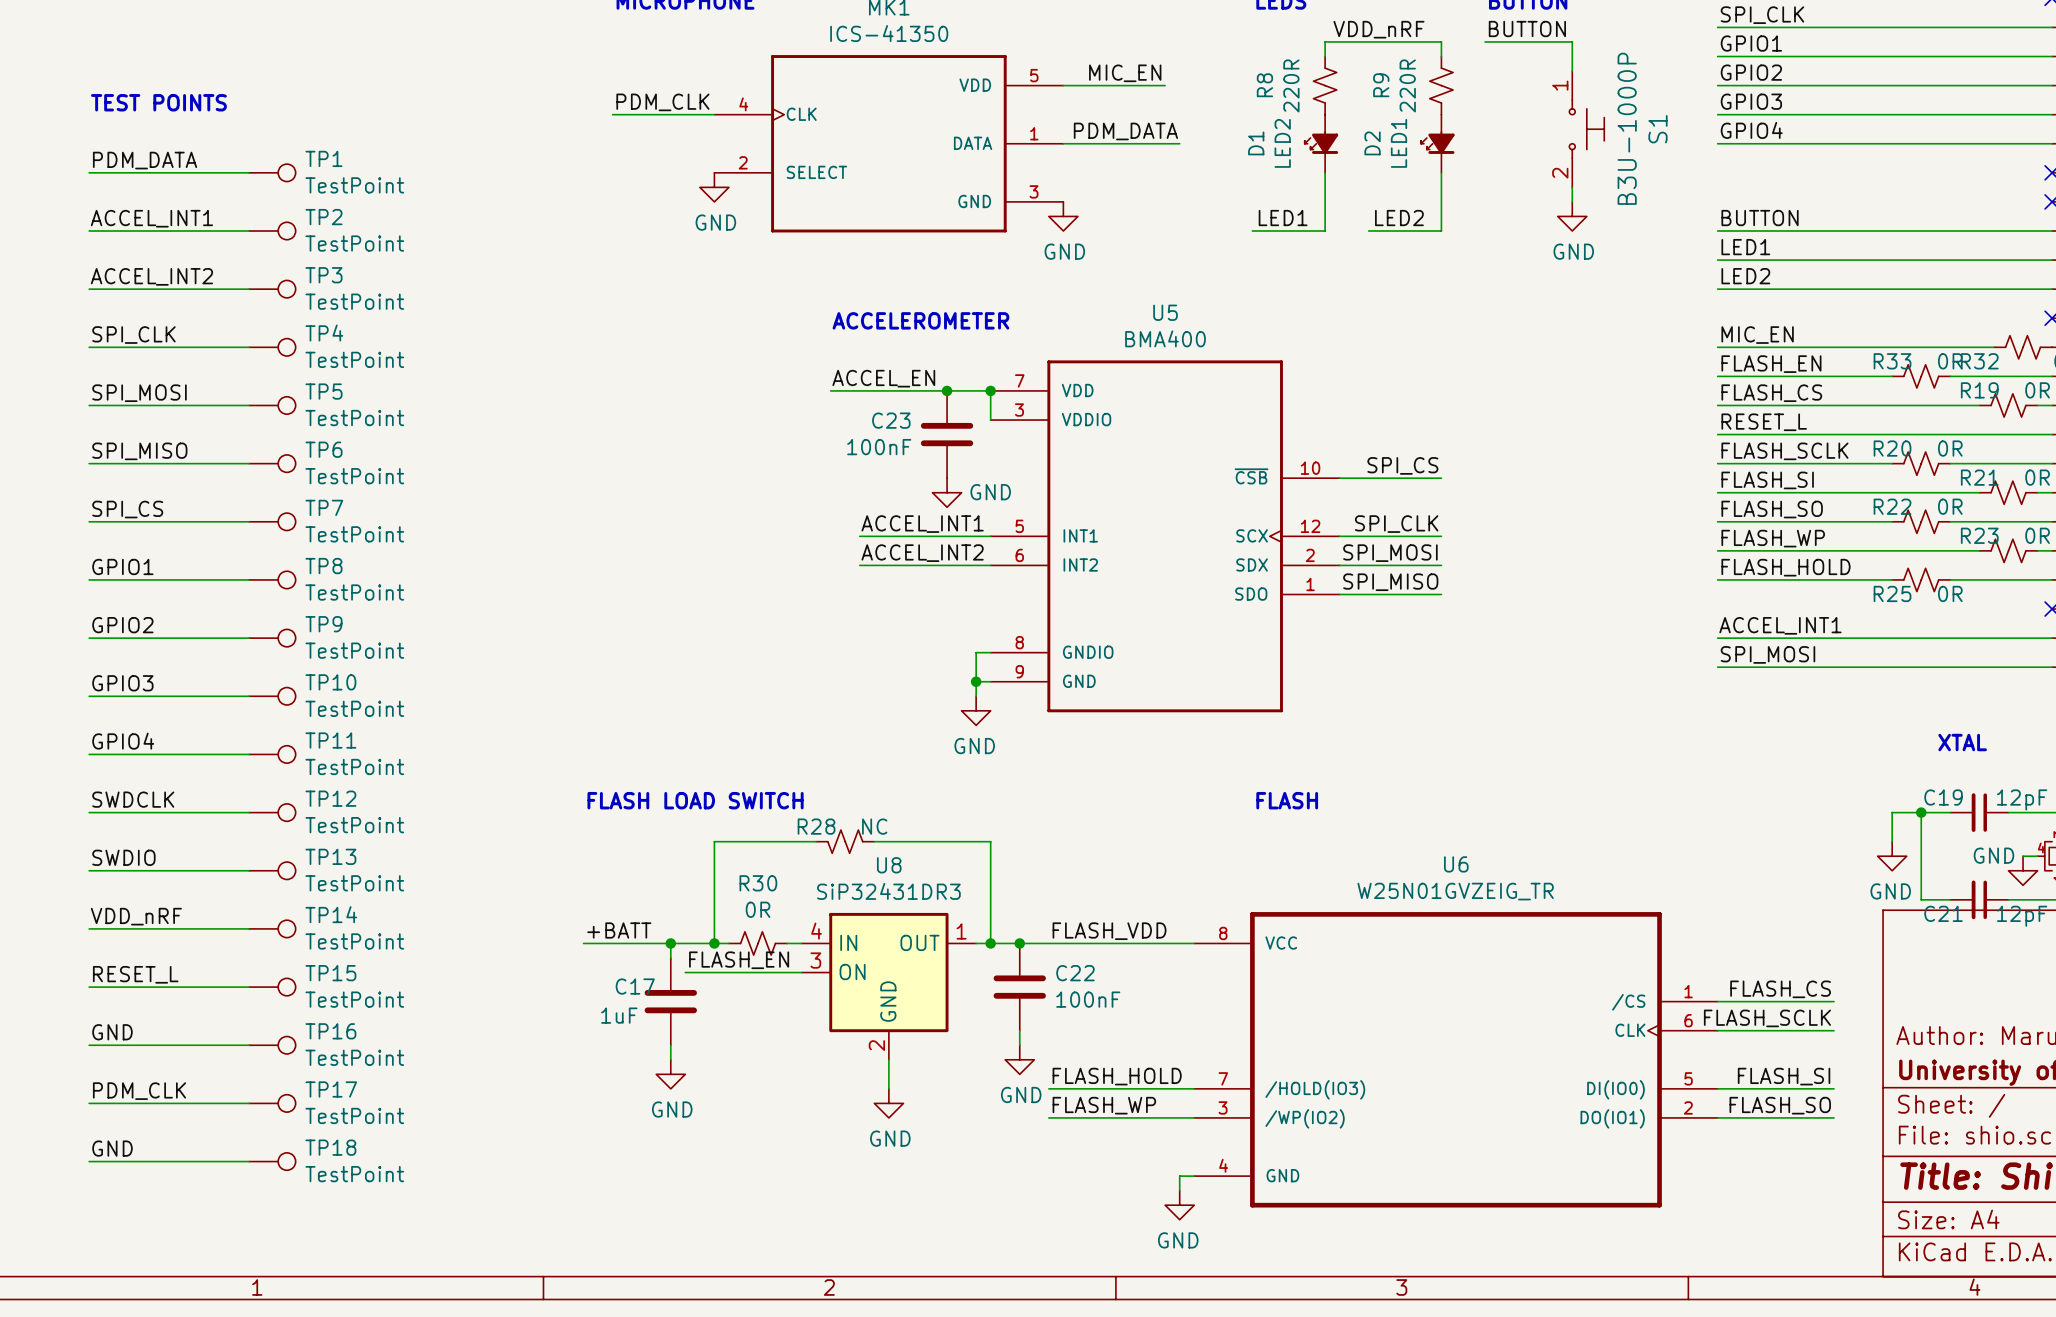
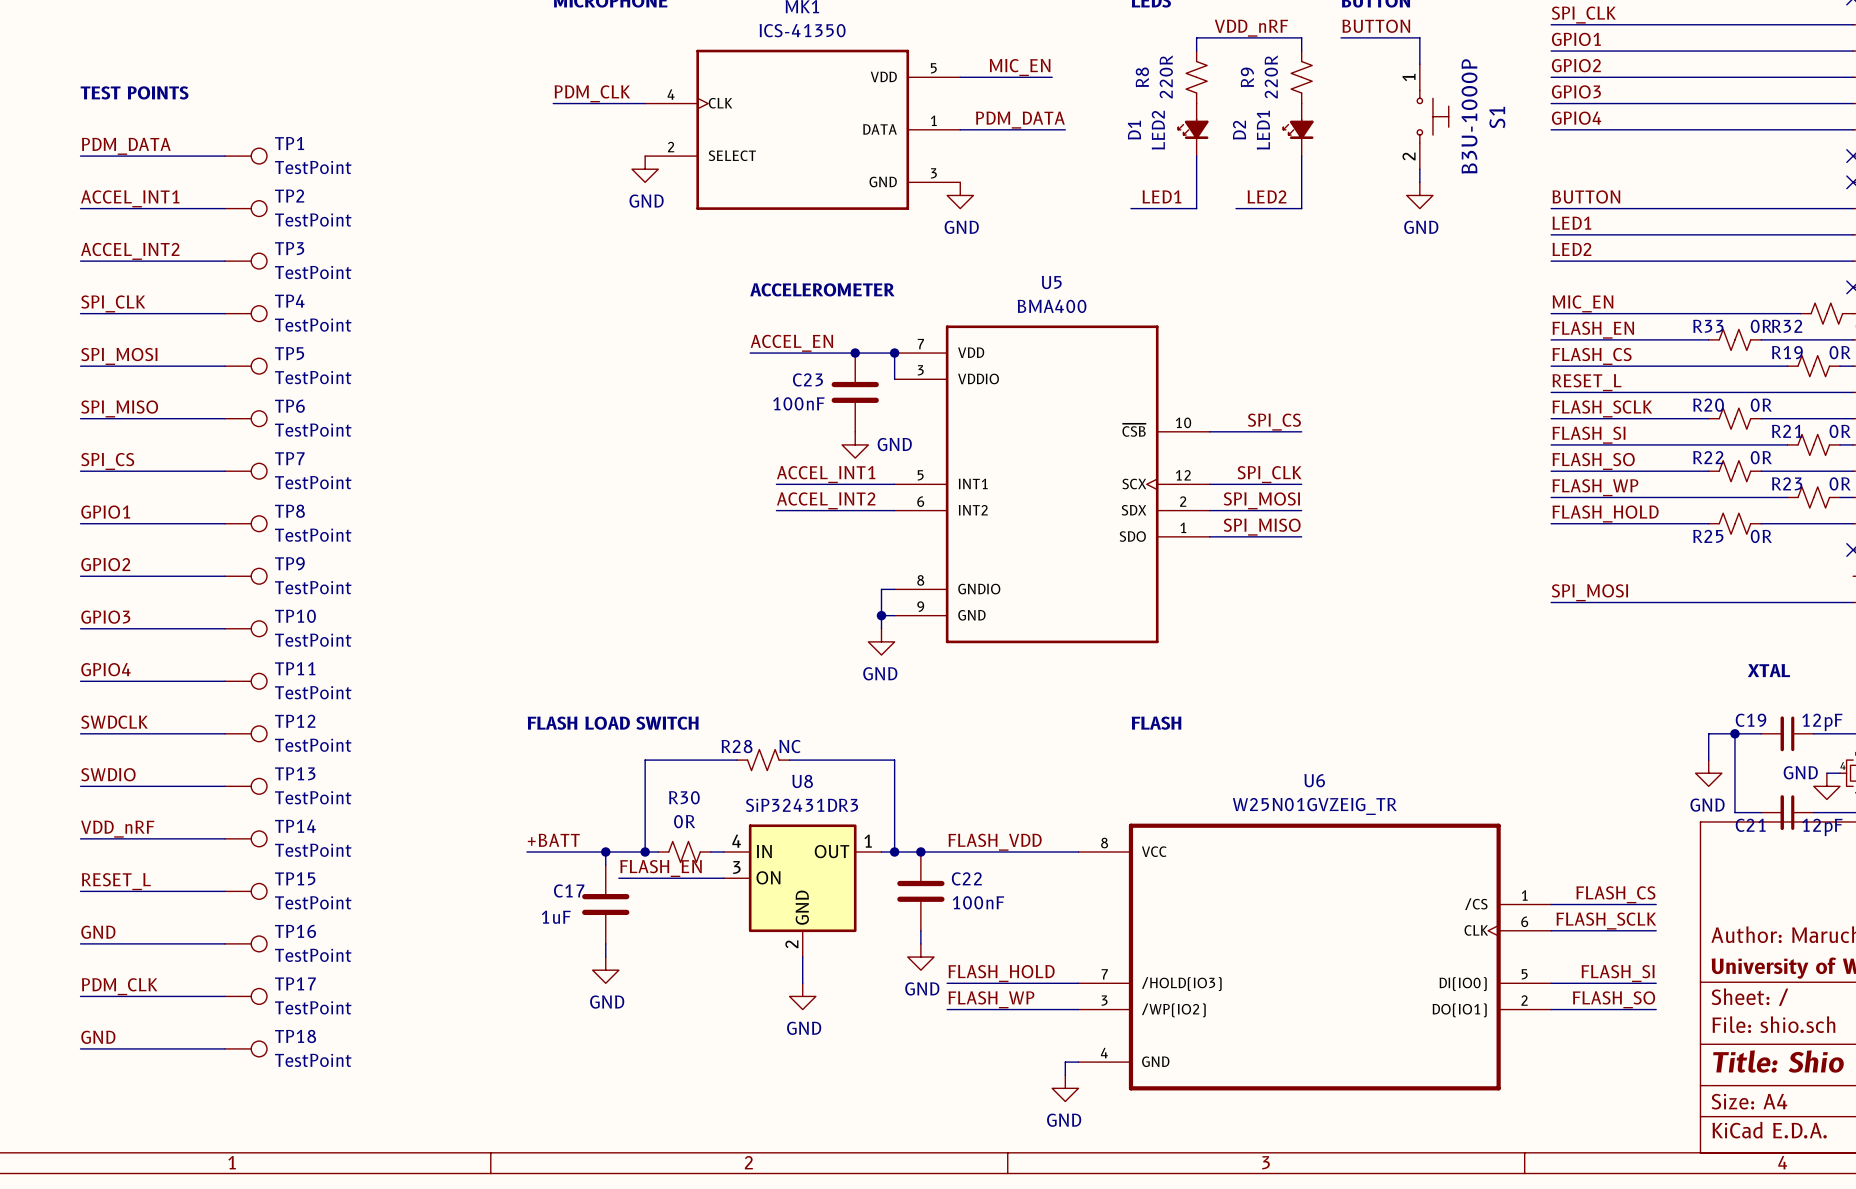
label: ACCEL_INT1 (1780, 625) -> none
wire: (1717, 638) (2052, 638) -> none

